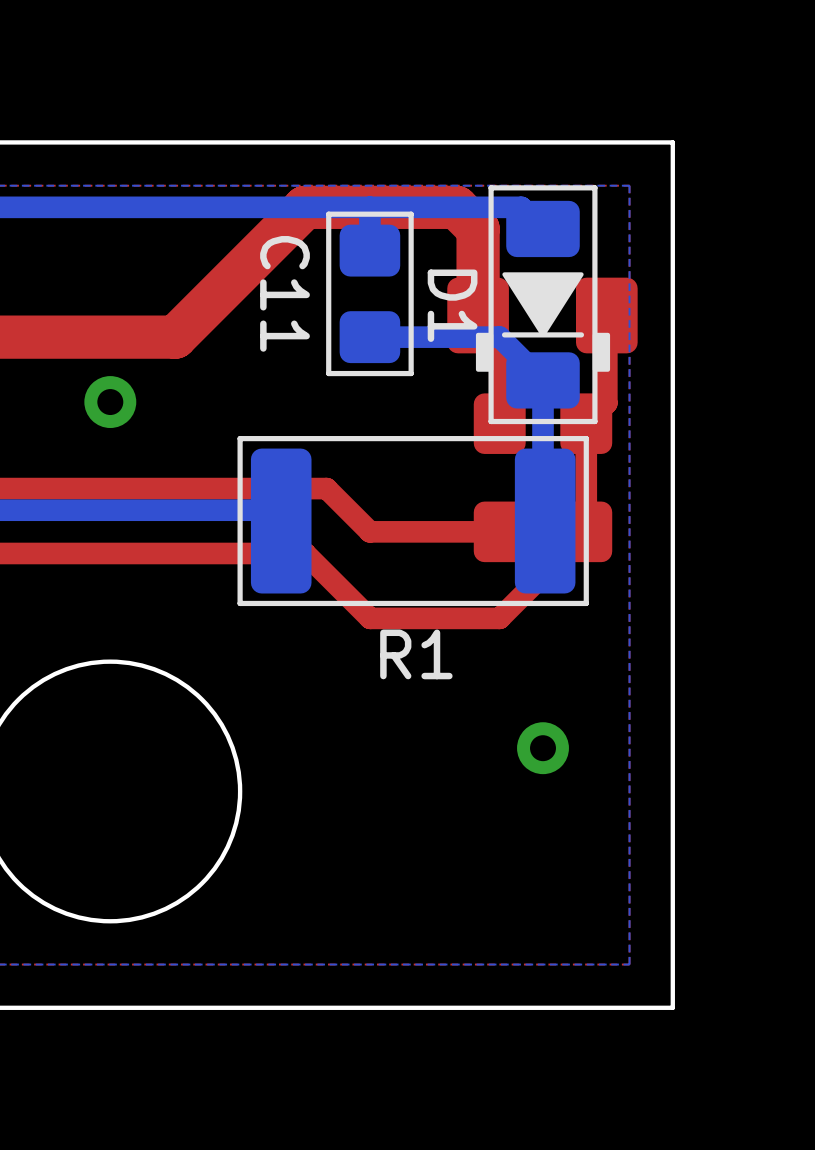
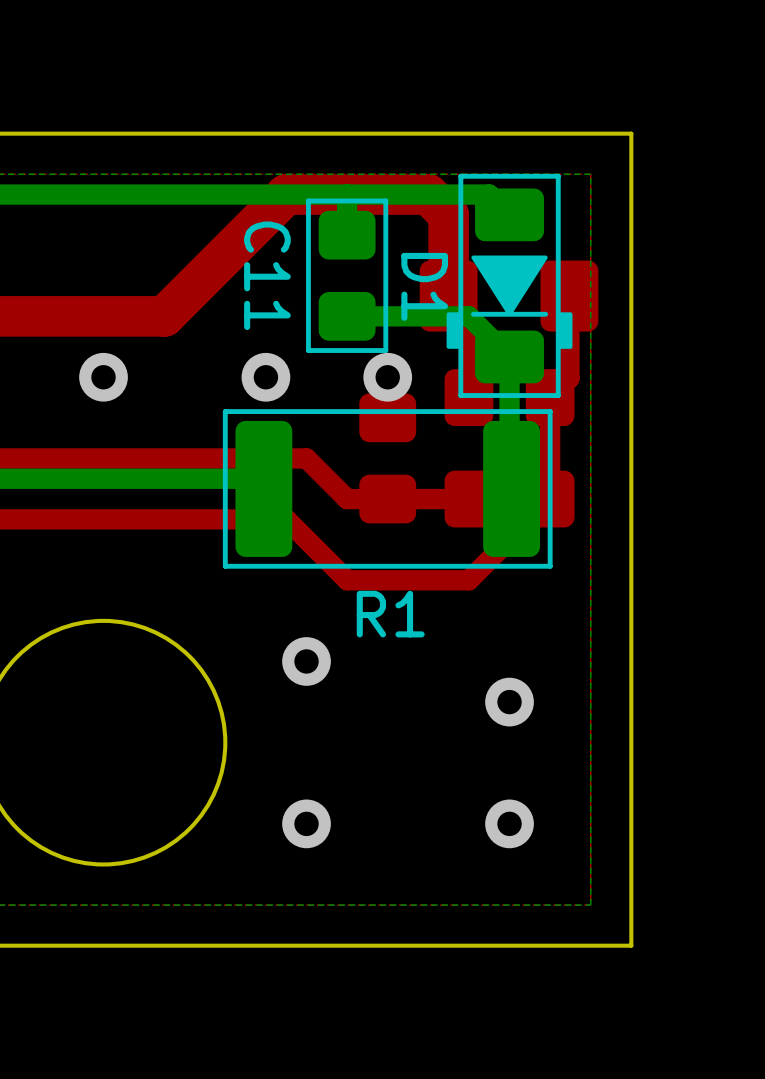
via: none -> (265, 377)
via: none -> (387, 377)
part: none -> (387, 458)
via: none -> (306, 661)
via: none -> (306, 823)
via: none -> (509, 823)

